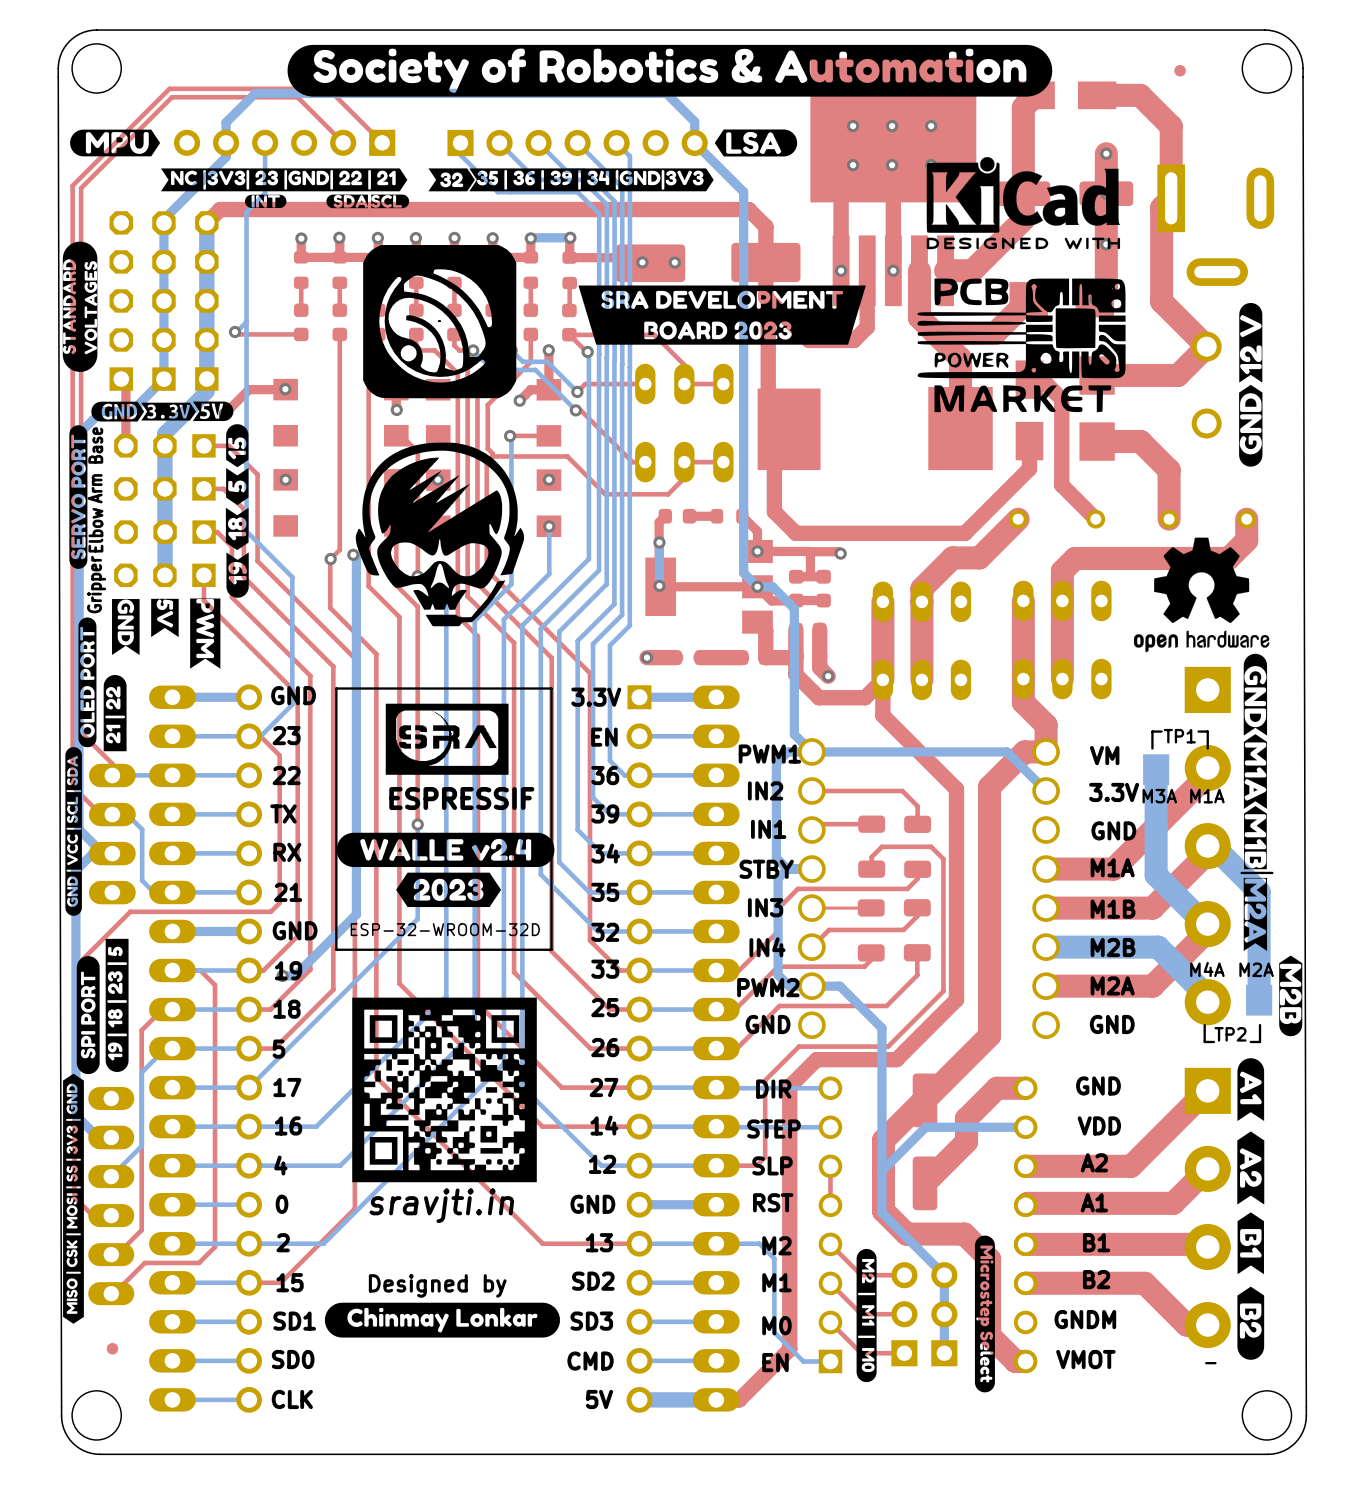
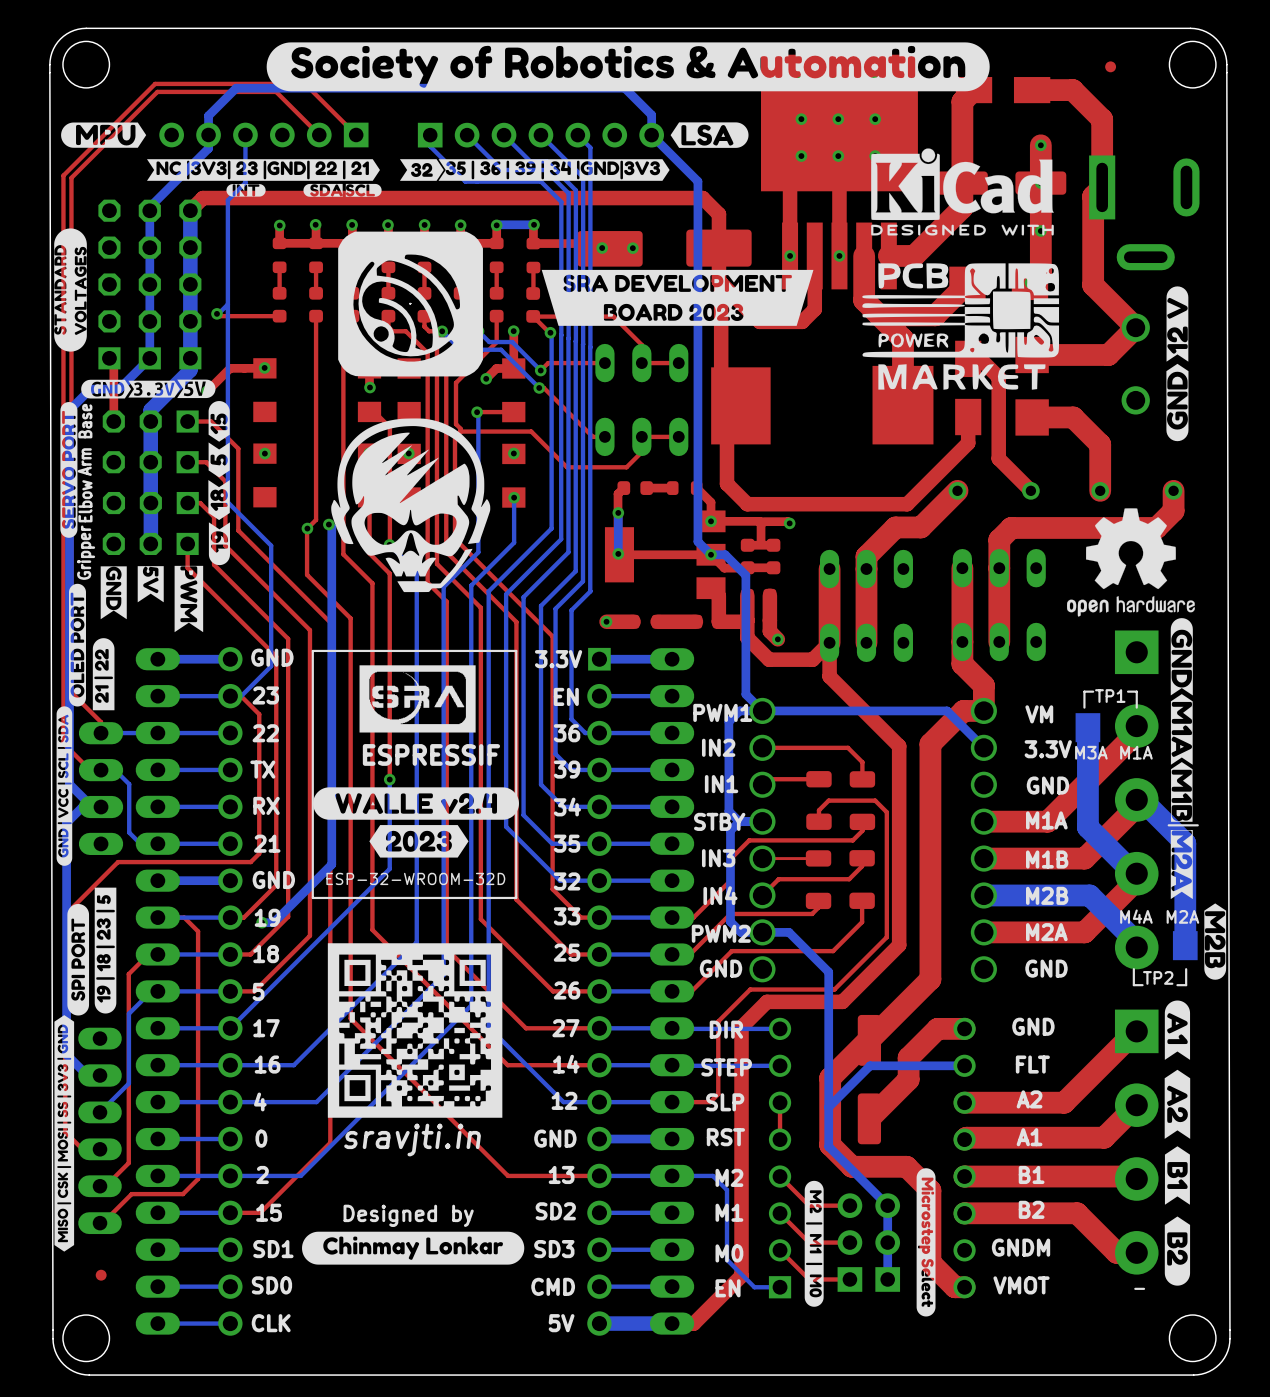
text: VDD (1099, 1125) -> FLT (1032, 1064)

